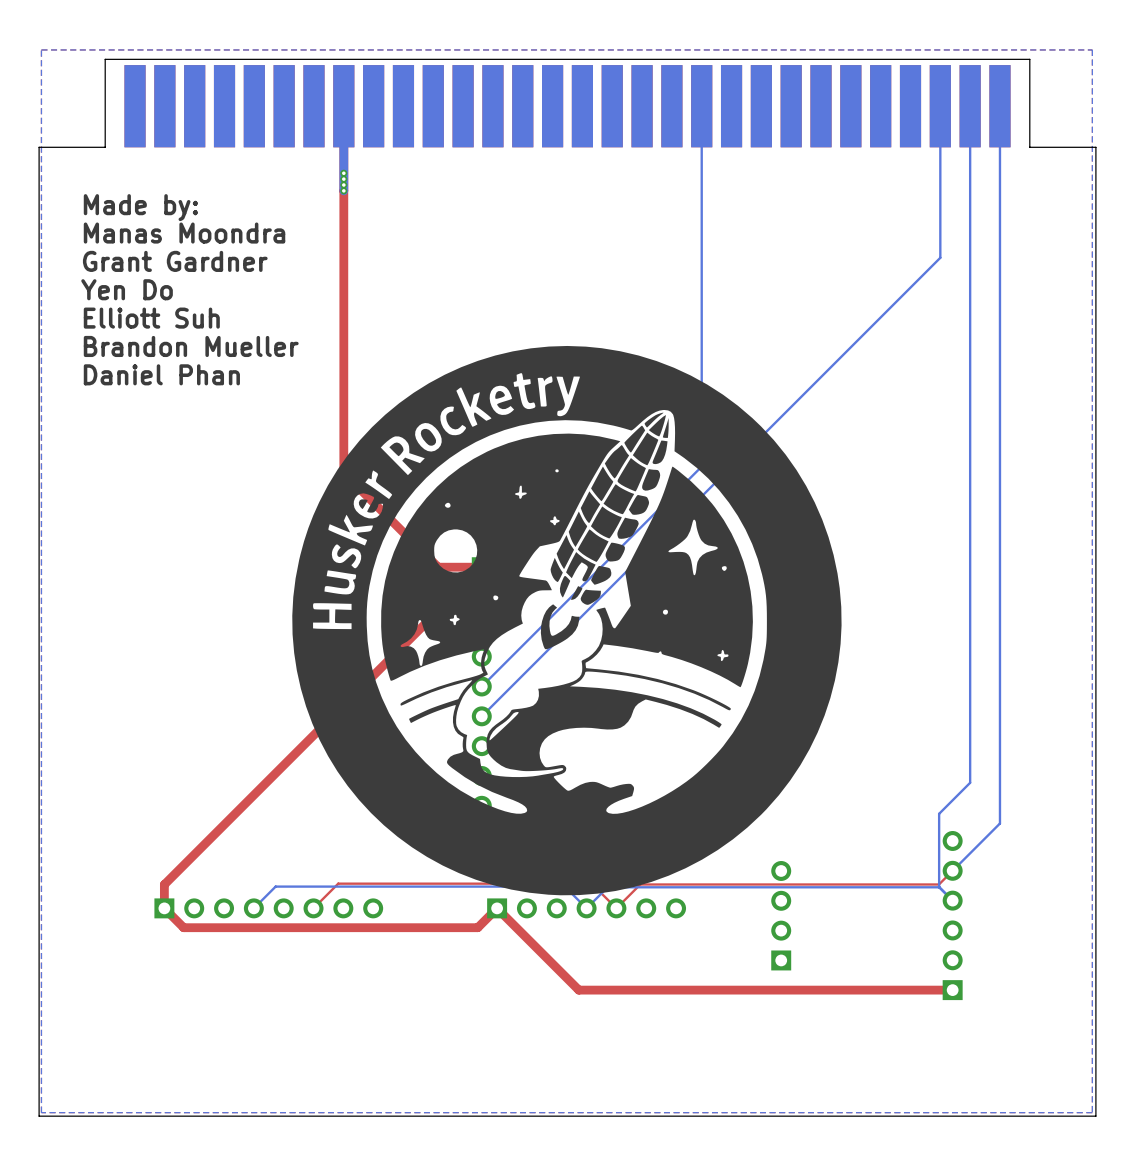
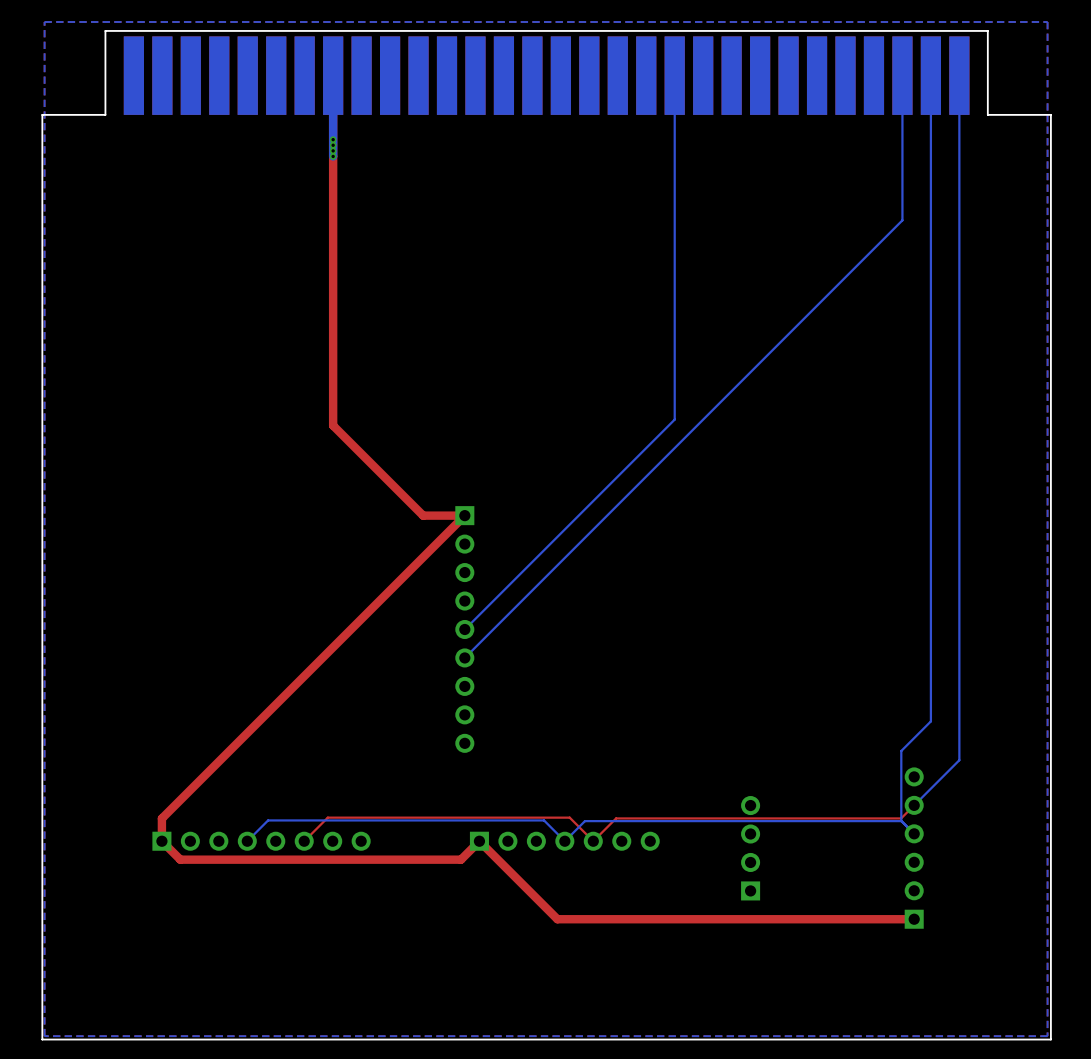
text: Made by: (140, 207) -> none
text: Manas Moondra (184, 233) -> none
text: Grant Gardner (175, 261) -> none
text: Yen Do (127, 289) -> none
text: Elliott Suh (151, 318) -> none
drawing: [292, 345, 842, 896] -> none
text: Brandon Mueller (191, 346) -> none
text: Daniel Phan (161, 374) -> none

